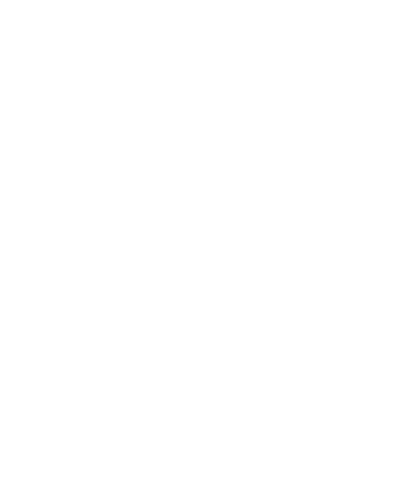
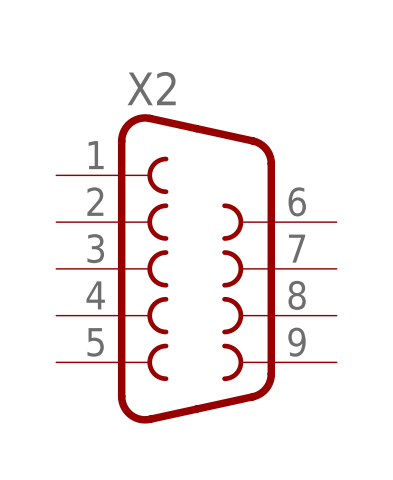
X2: none -> (196, 268)

